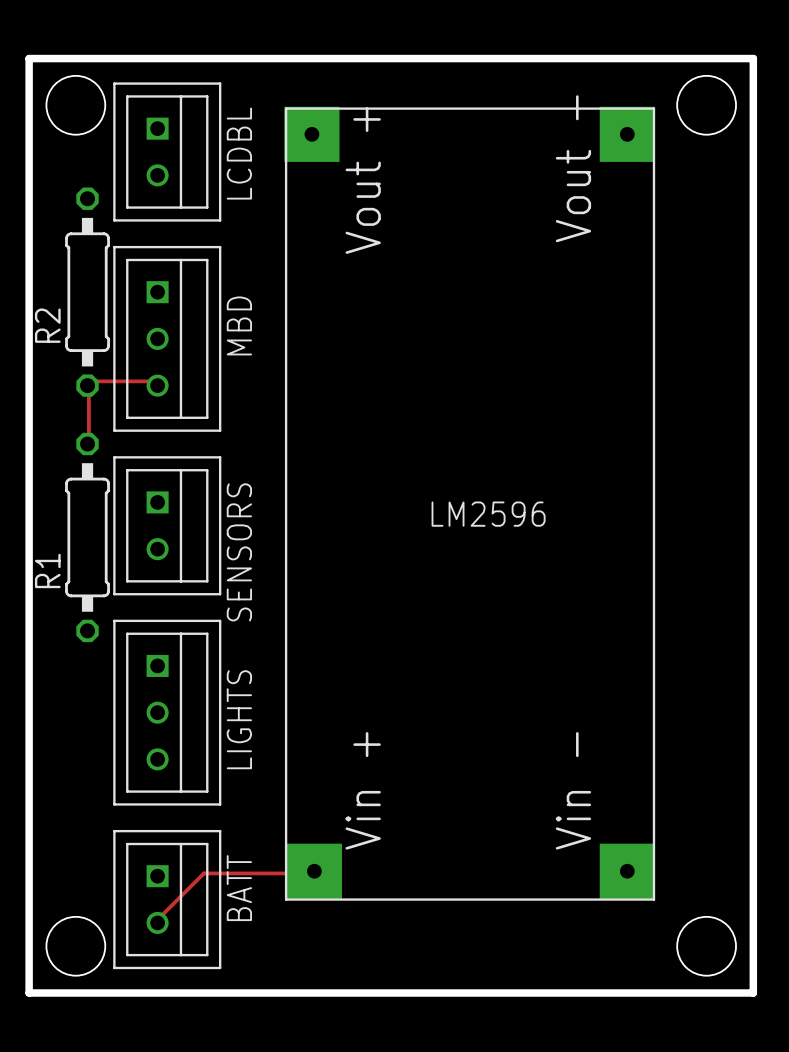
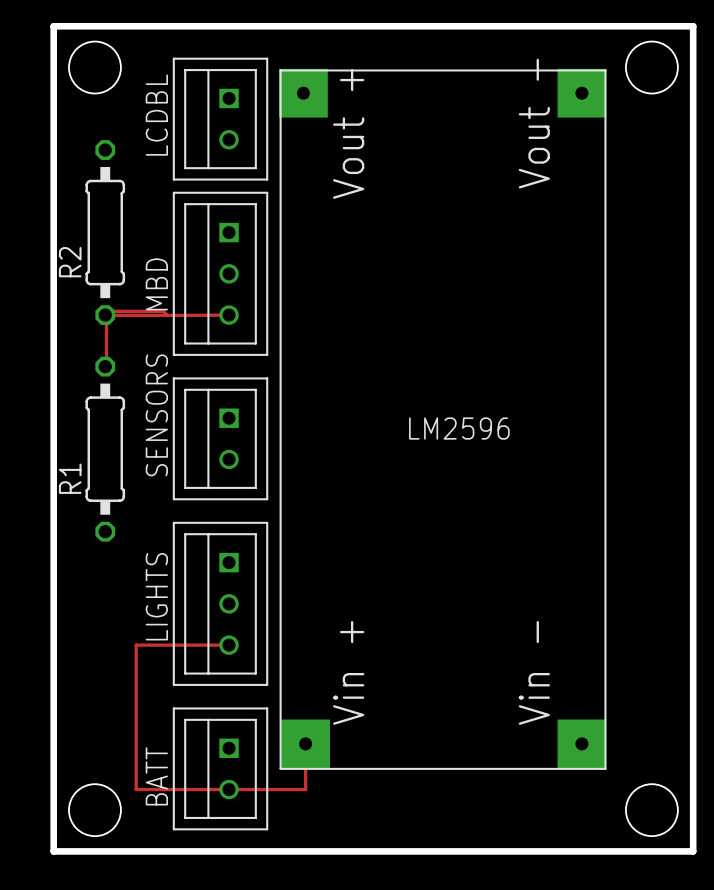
LCDBL: (167, 152) -> none
LCDBL: none -> (220, 119)
MBD: (167, 338) -> none
MBD: none -> (220, 273)
track: none -> (229, 315) (105, 315)
SENSORS: (167, 525) -> none
SENSORS: none -> (220, 438)
LIGHTS: (167, 712) -> none
LIGHTS: none -> (220, 603)
track: (314, 871) (314, 873) (203, 873) (157, 919) (157, 922) -> (305, 743) (305, 789) (136, 789) (136, 645) (229, 645)
BATT: (167, 899) -> none
BATT: none -> (220, 768)

